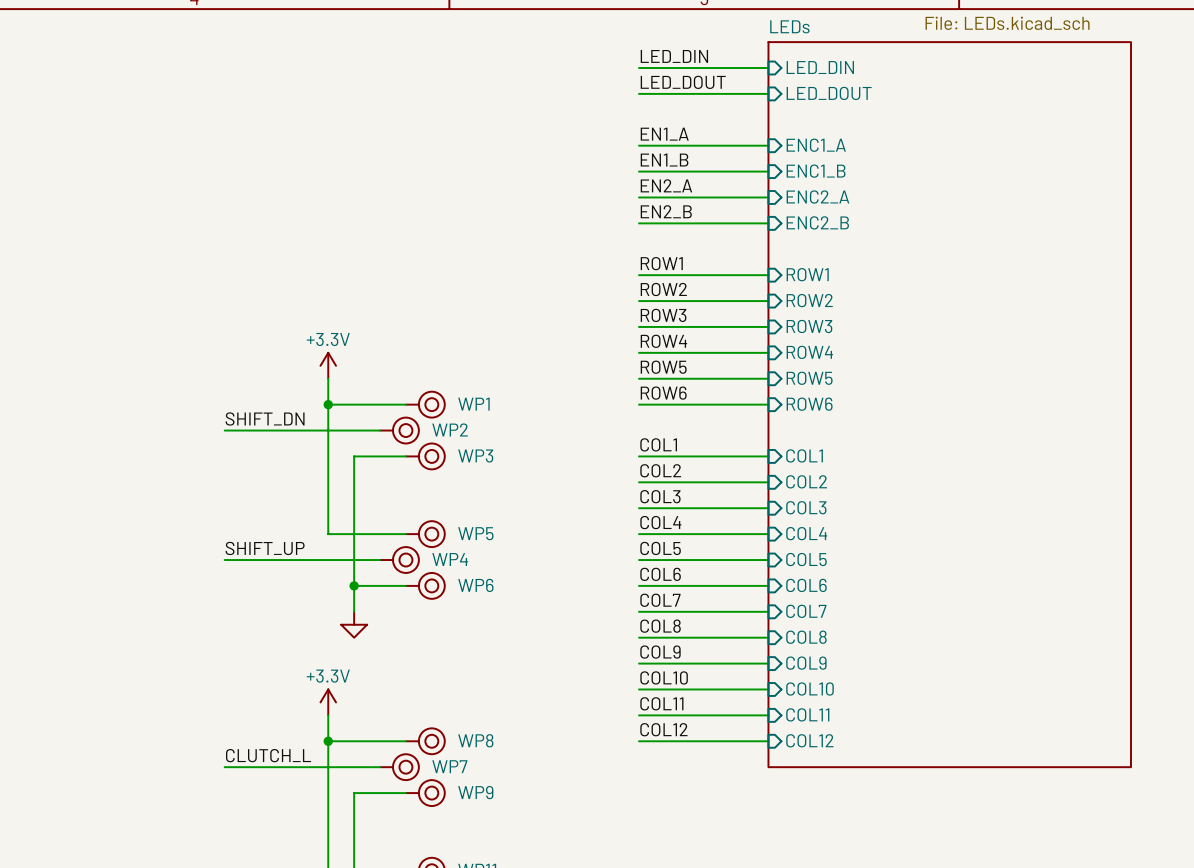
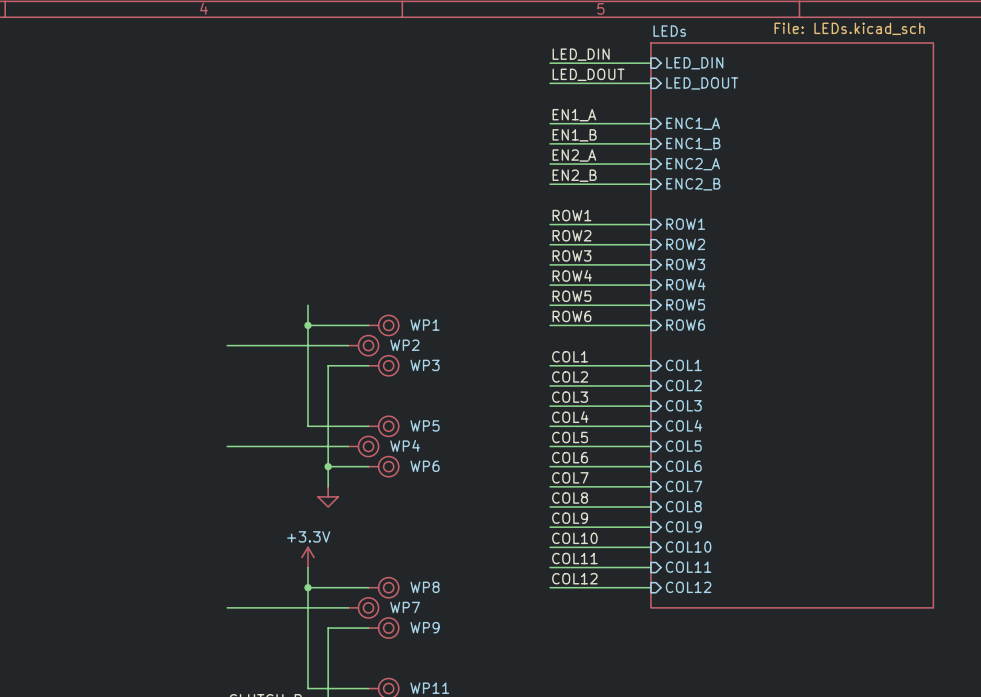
power symbol: +3.3V (328, 365) -> none
label: SHIFT_DN (265, 418) -> none
label: SHIFT_UP (265, 548) -> none
label: CLUTCH_L (268, 755) -> none

